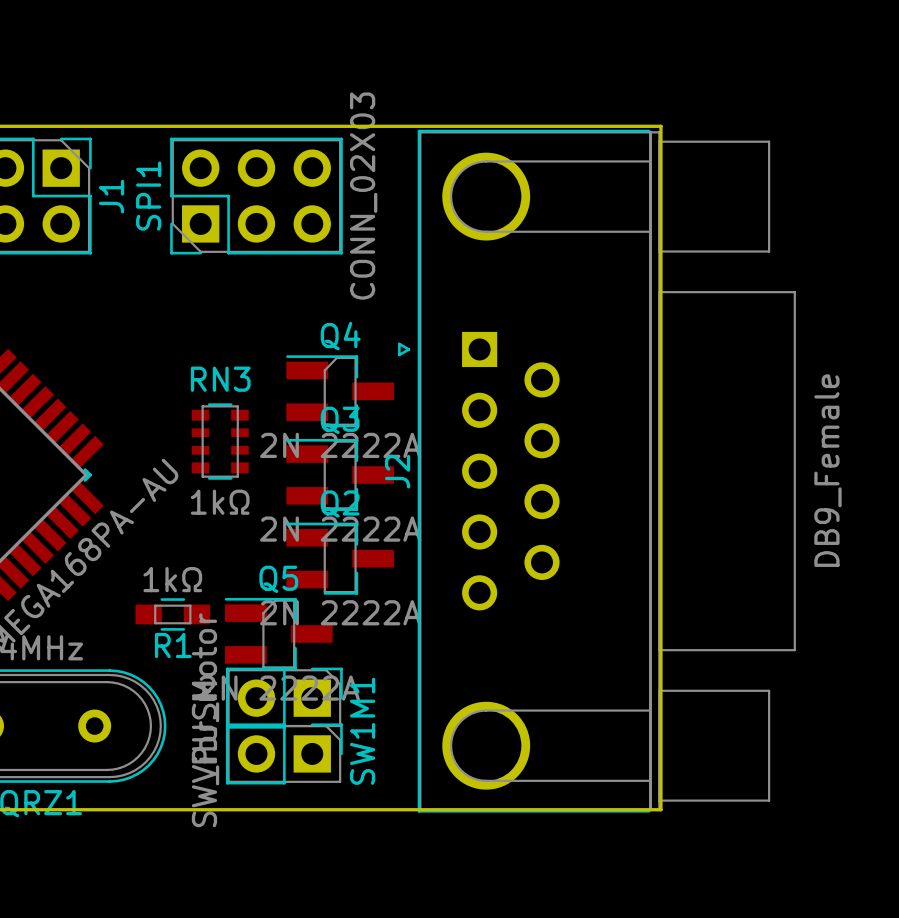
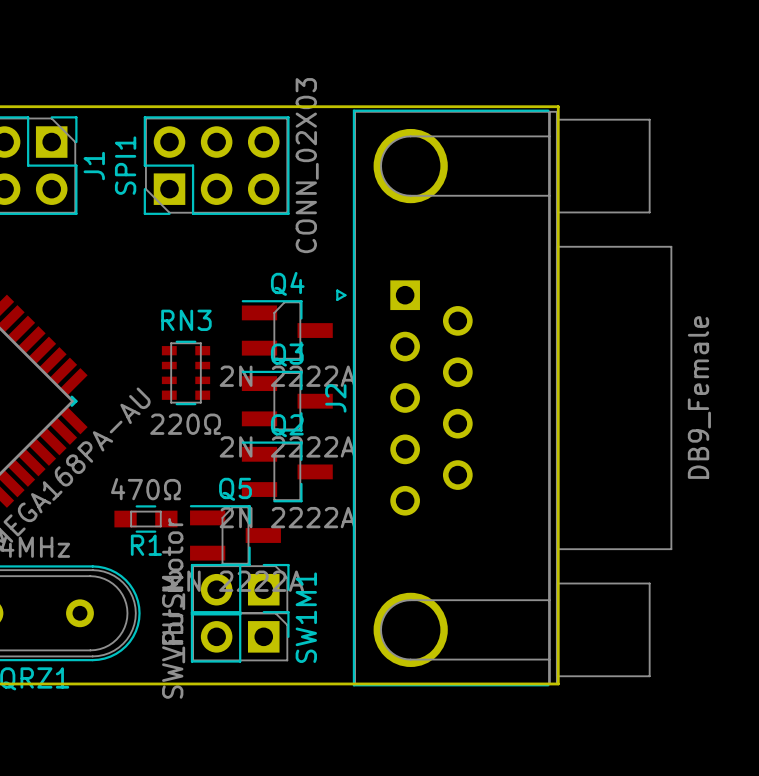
RN3 value: 1kΩ (220, 502) -> 220Ω (185, 424)
R1 value: 1kΩ (172, 579) -> 470Ω (145, 489)

